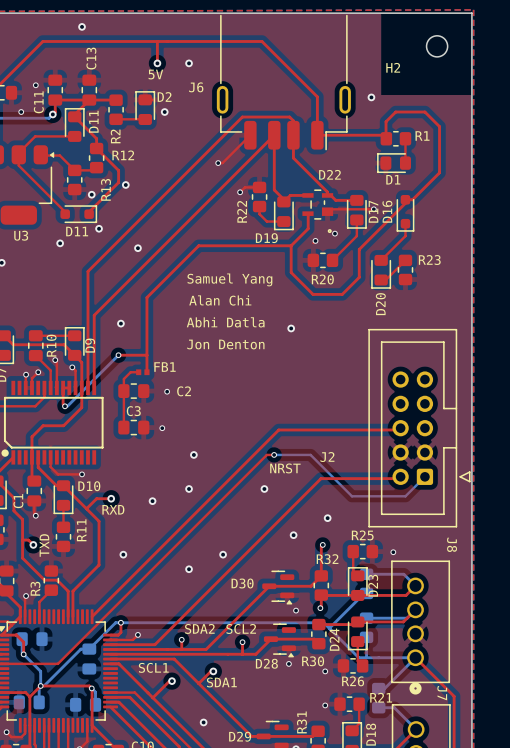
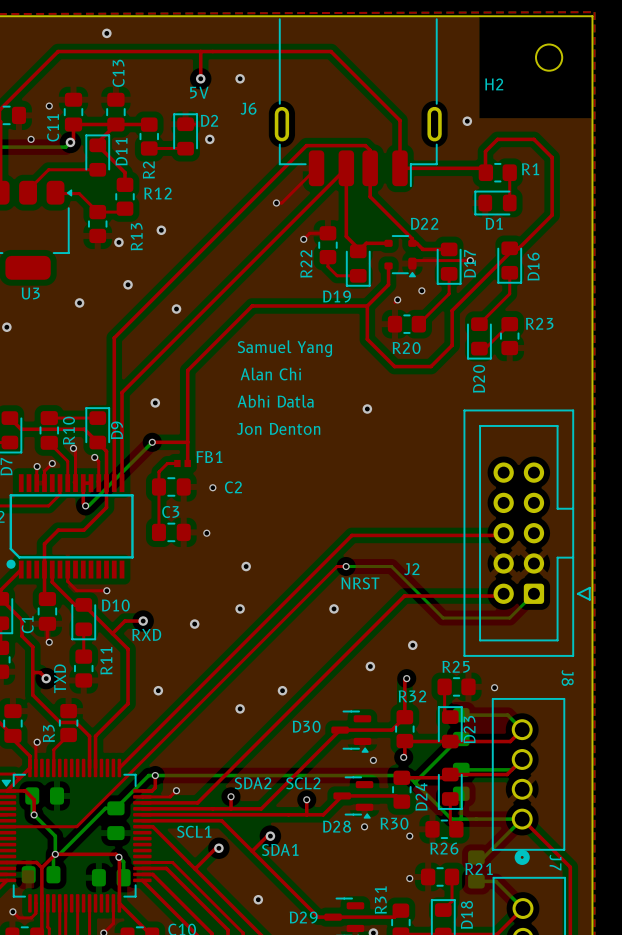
top track: (96, 148) (118, 170) (118, 182) (86, 214) -> none
top track: (18, 155) (18, 165) (67, 214) -> none
D22 footprint: [302, 189, 334, 234] -> [384, 235, 417, 278]
D16 footprint: [396, 194, 415, 232] -> [497, 241, 522, 284]
D16 name position: D16 (387, 211) -> D16 (533, 266)
D11: (78, 214) -> none

